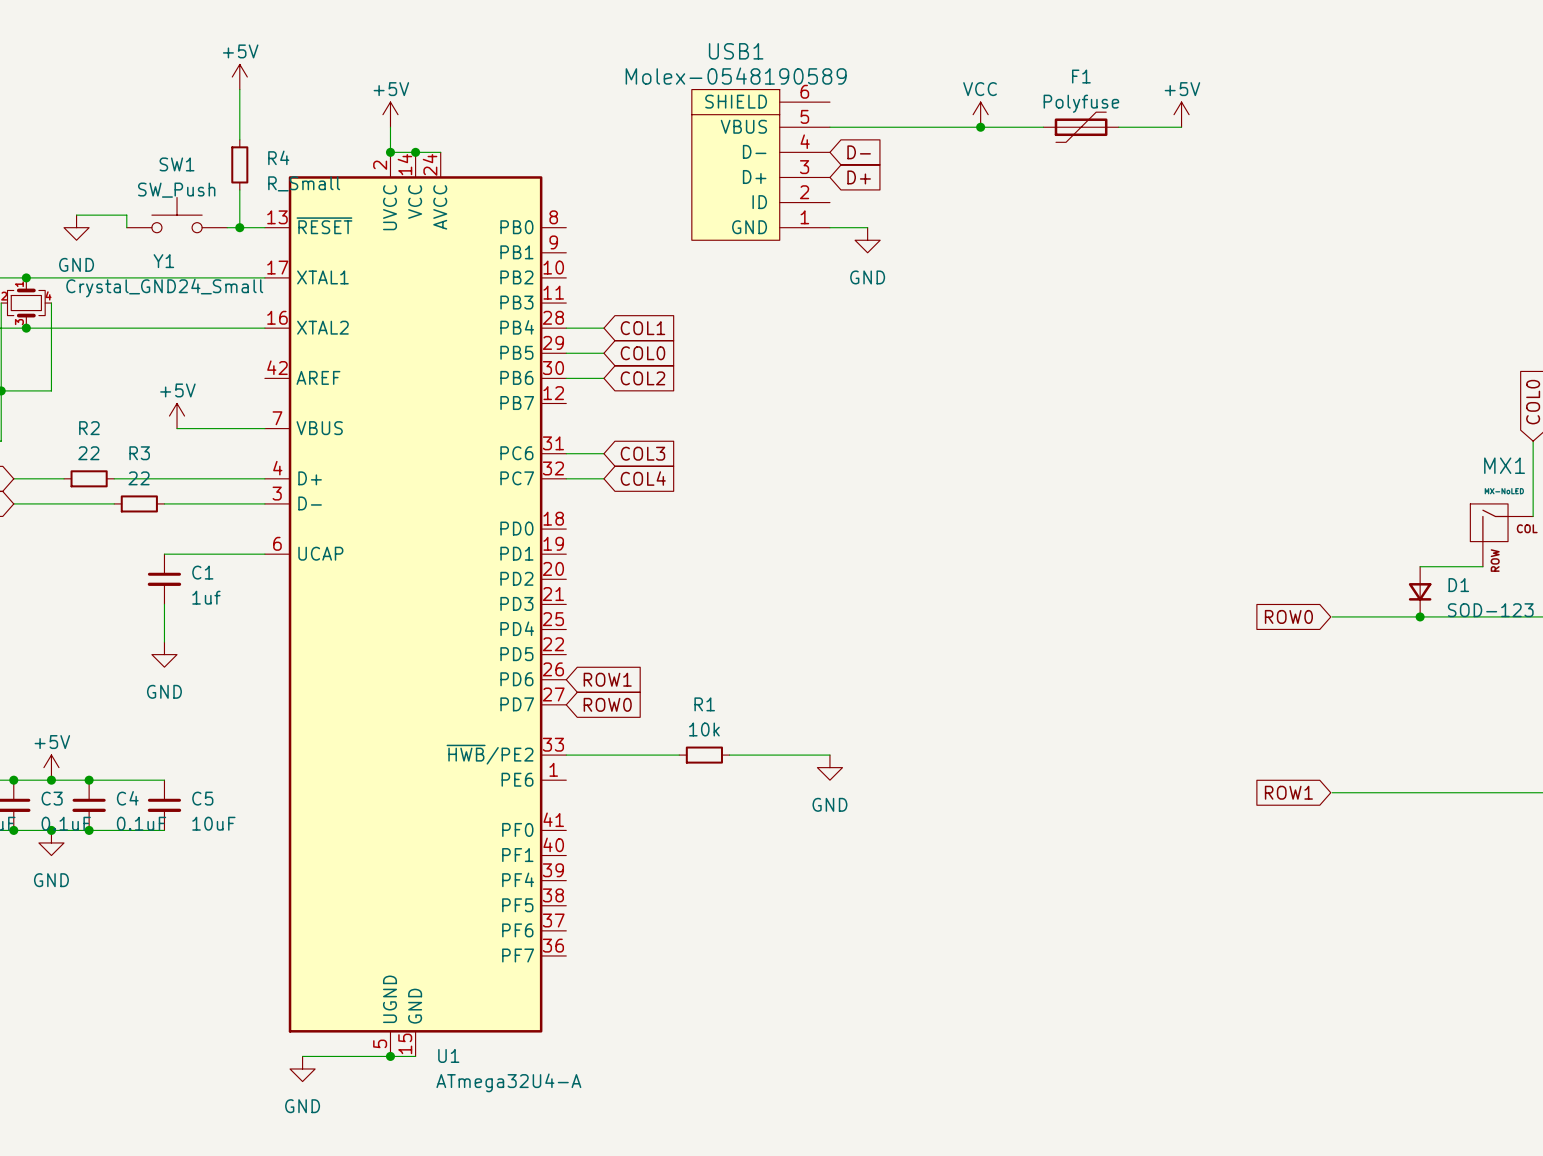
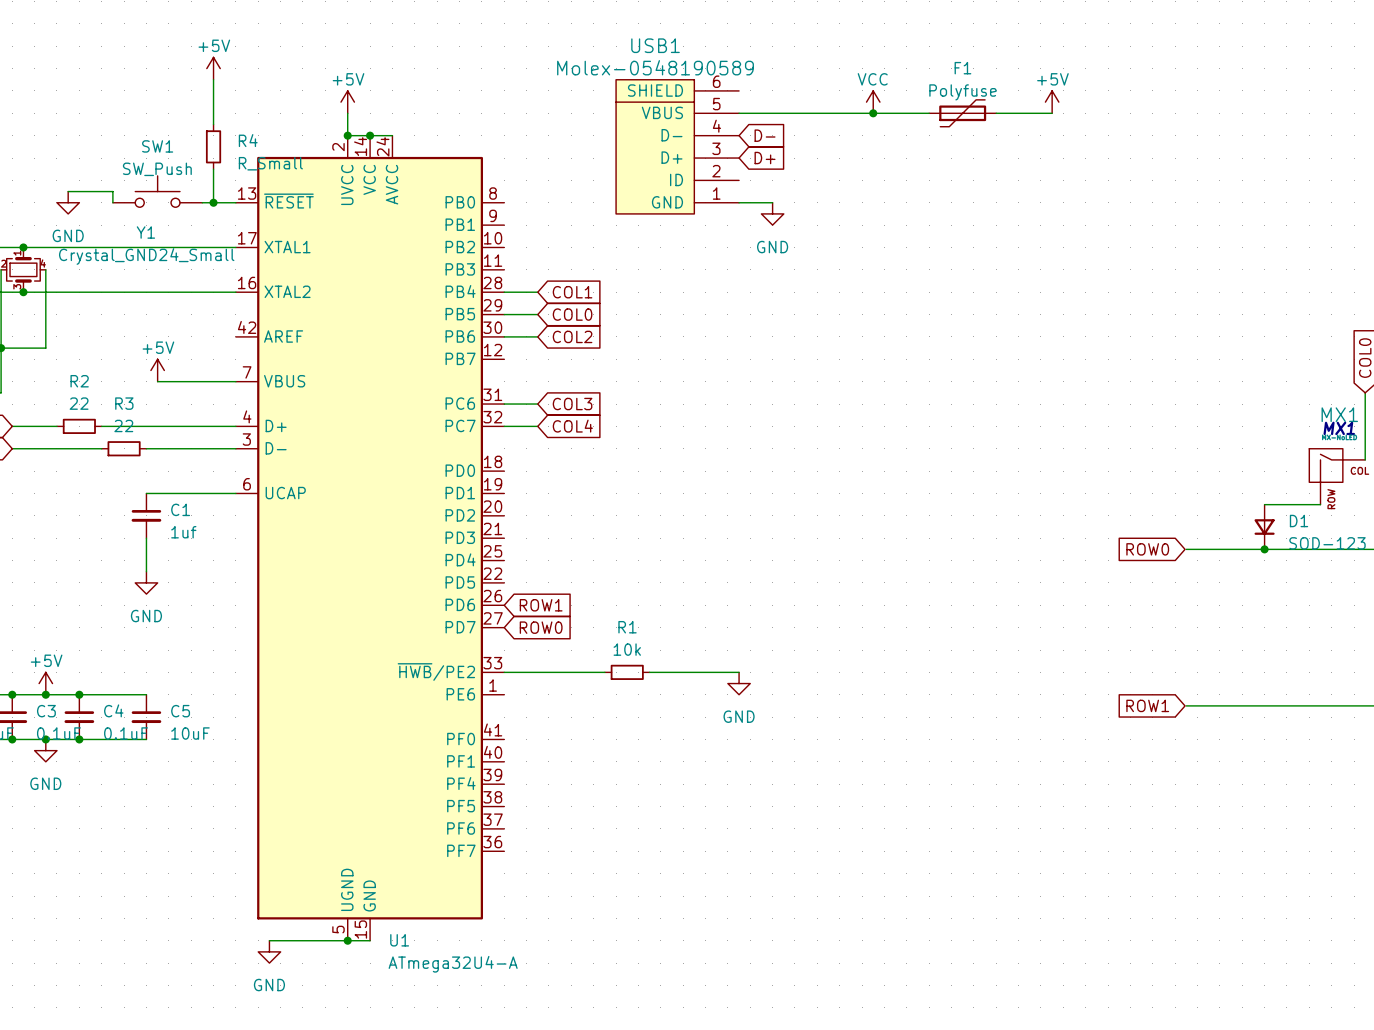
text: none -> MX1 (1339, 428)

